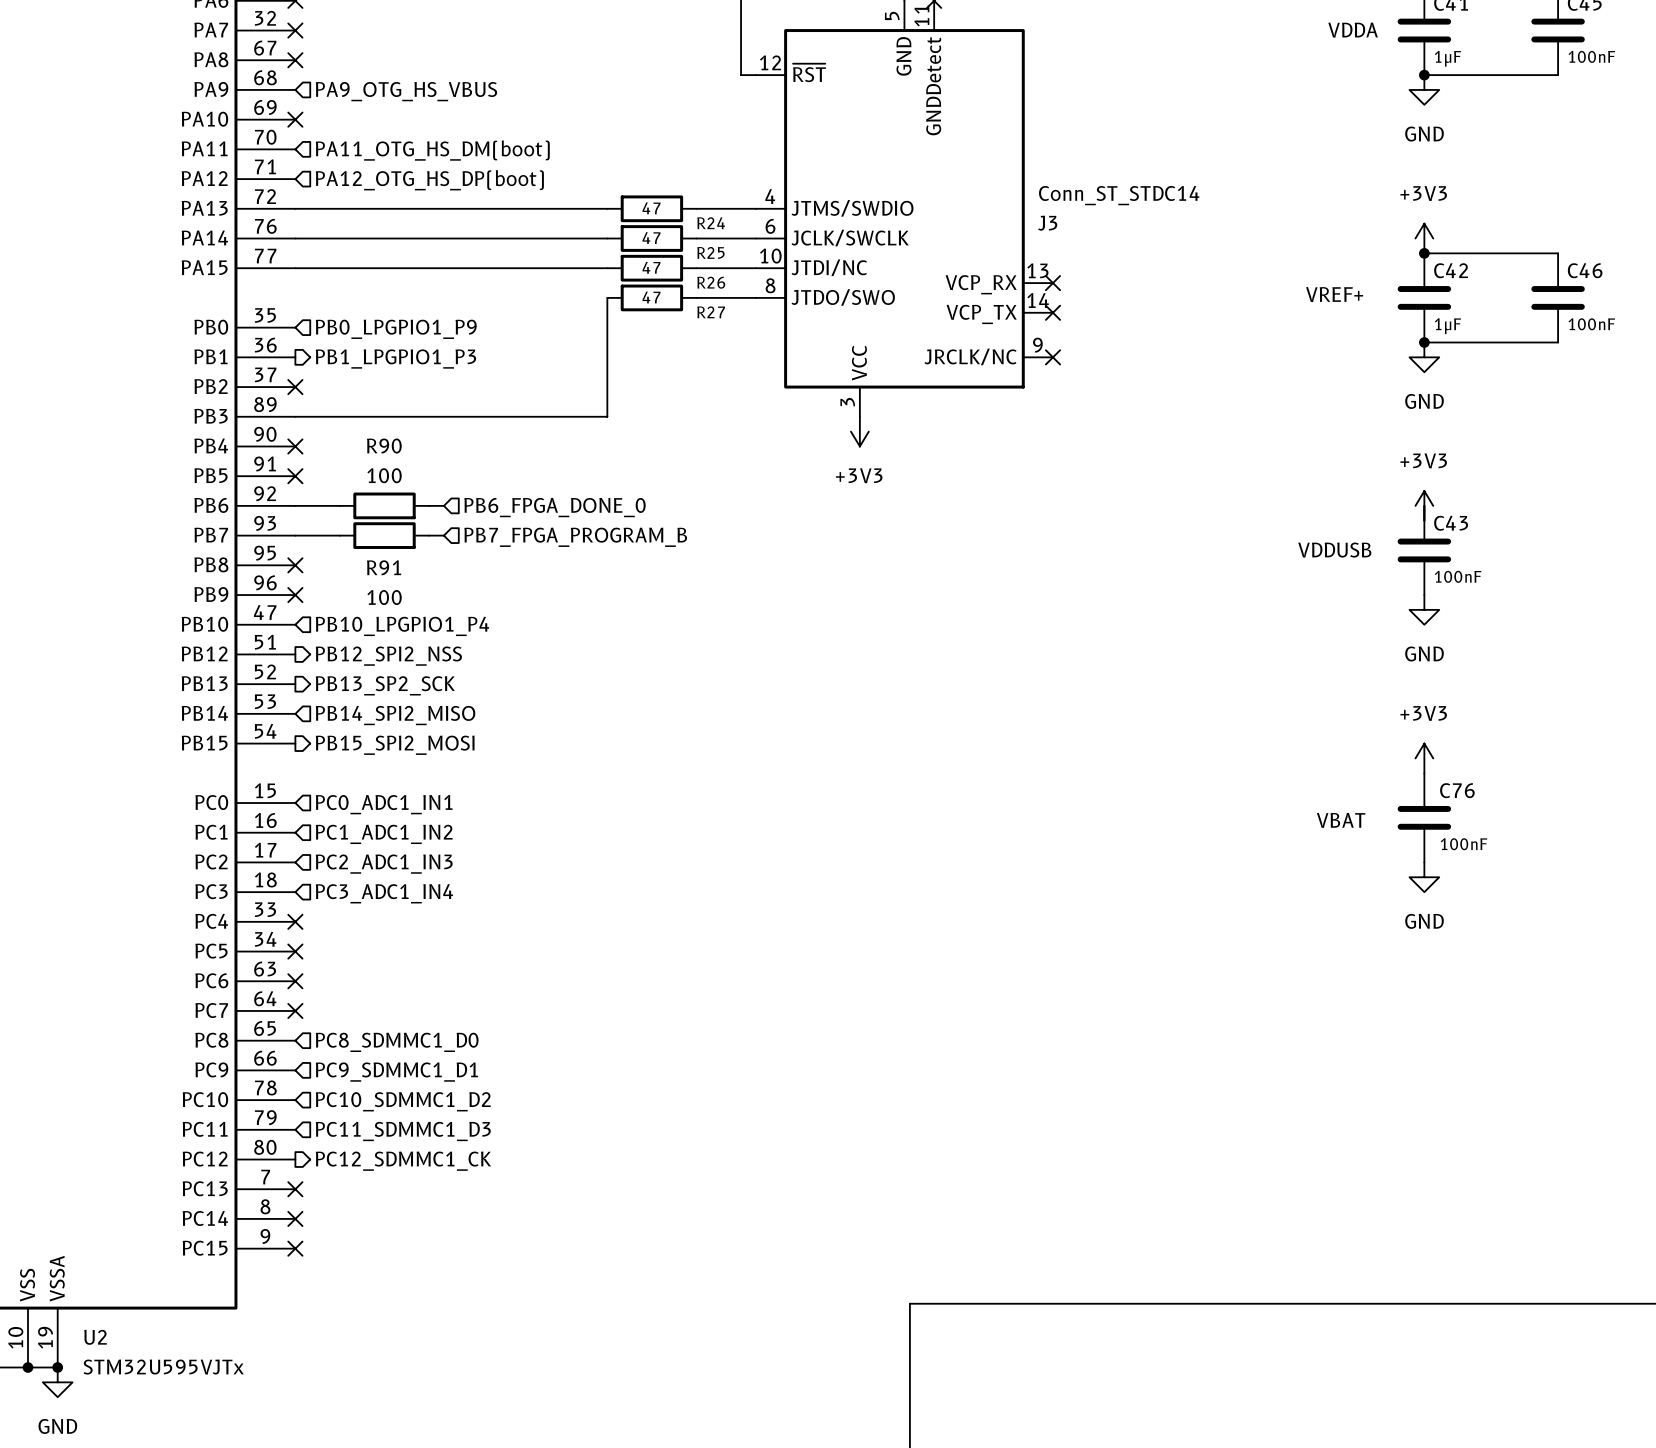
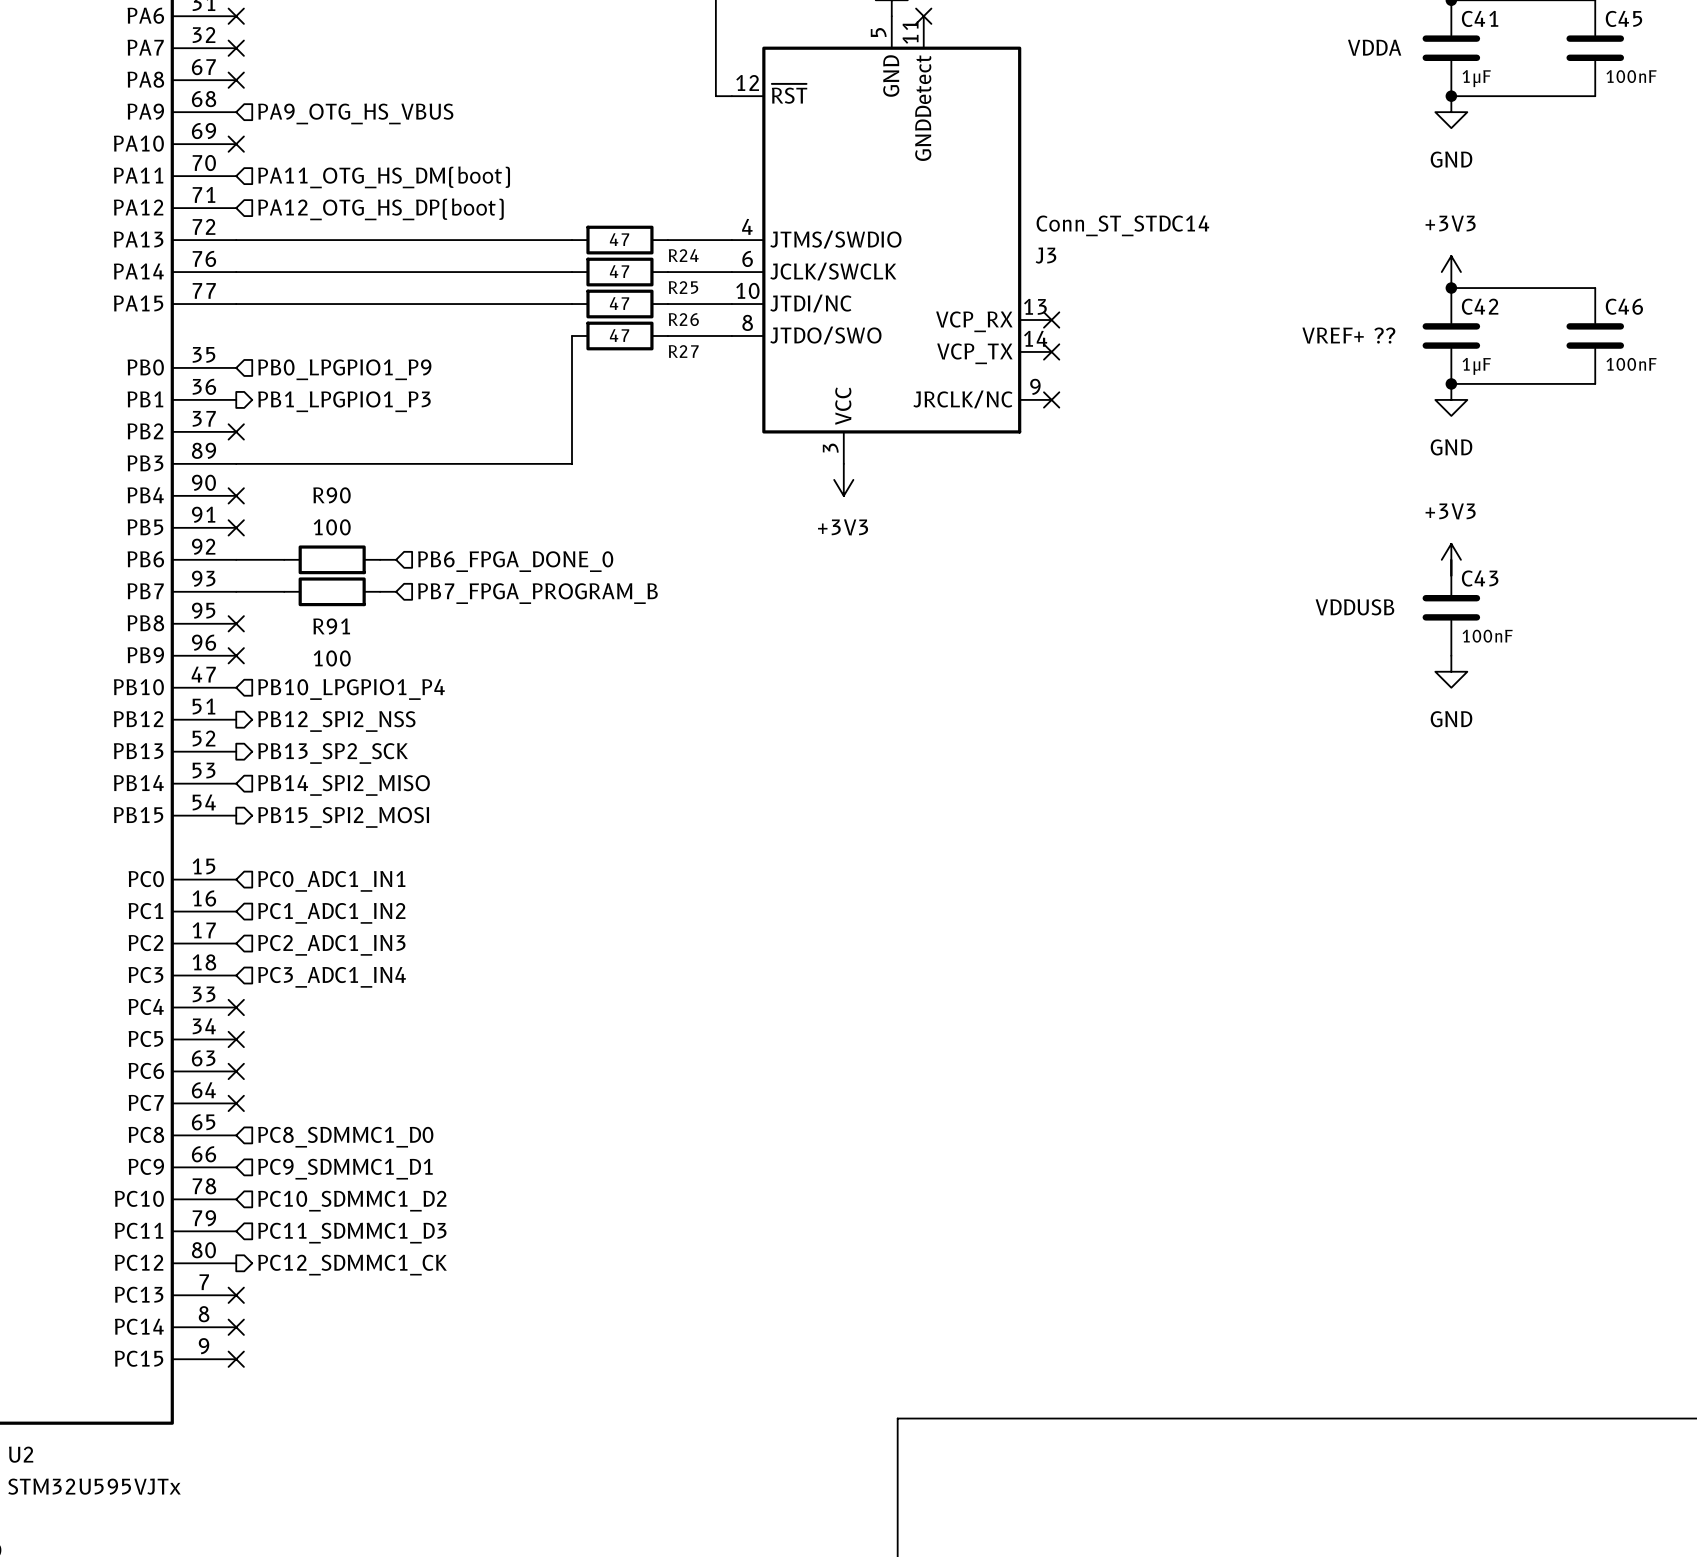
text: VREF+ (1334, 294) -> VREF+ ?? (1348, 335)
power symbol: +3V3 (1424, 758) -> none
C76: 100nF (1424, 817) -> none
text: VBAT (1341, 820) -> none
power symbol: GND (1424, 877) -> none

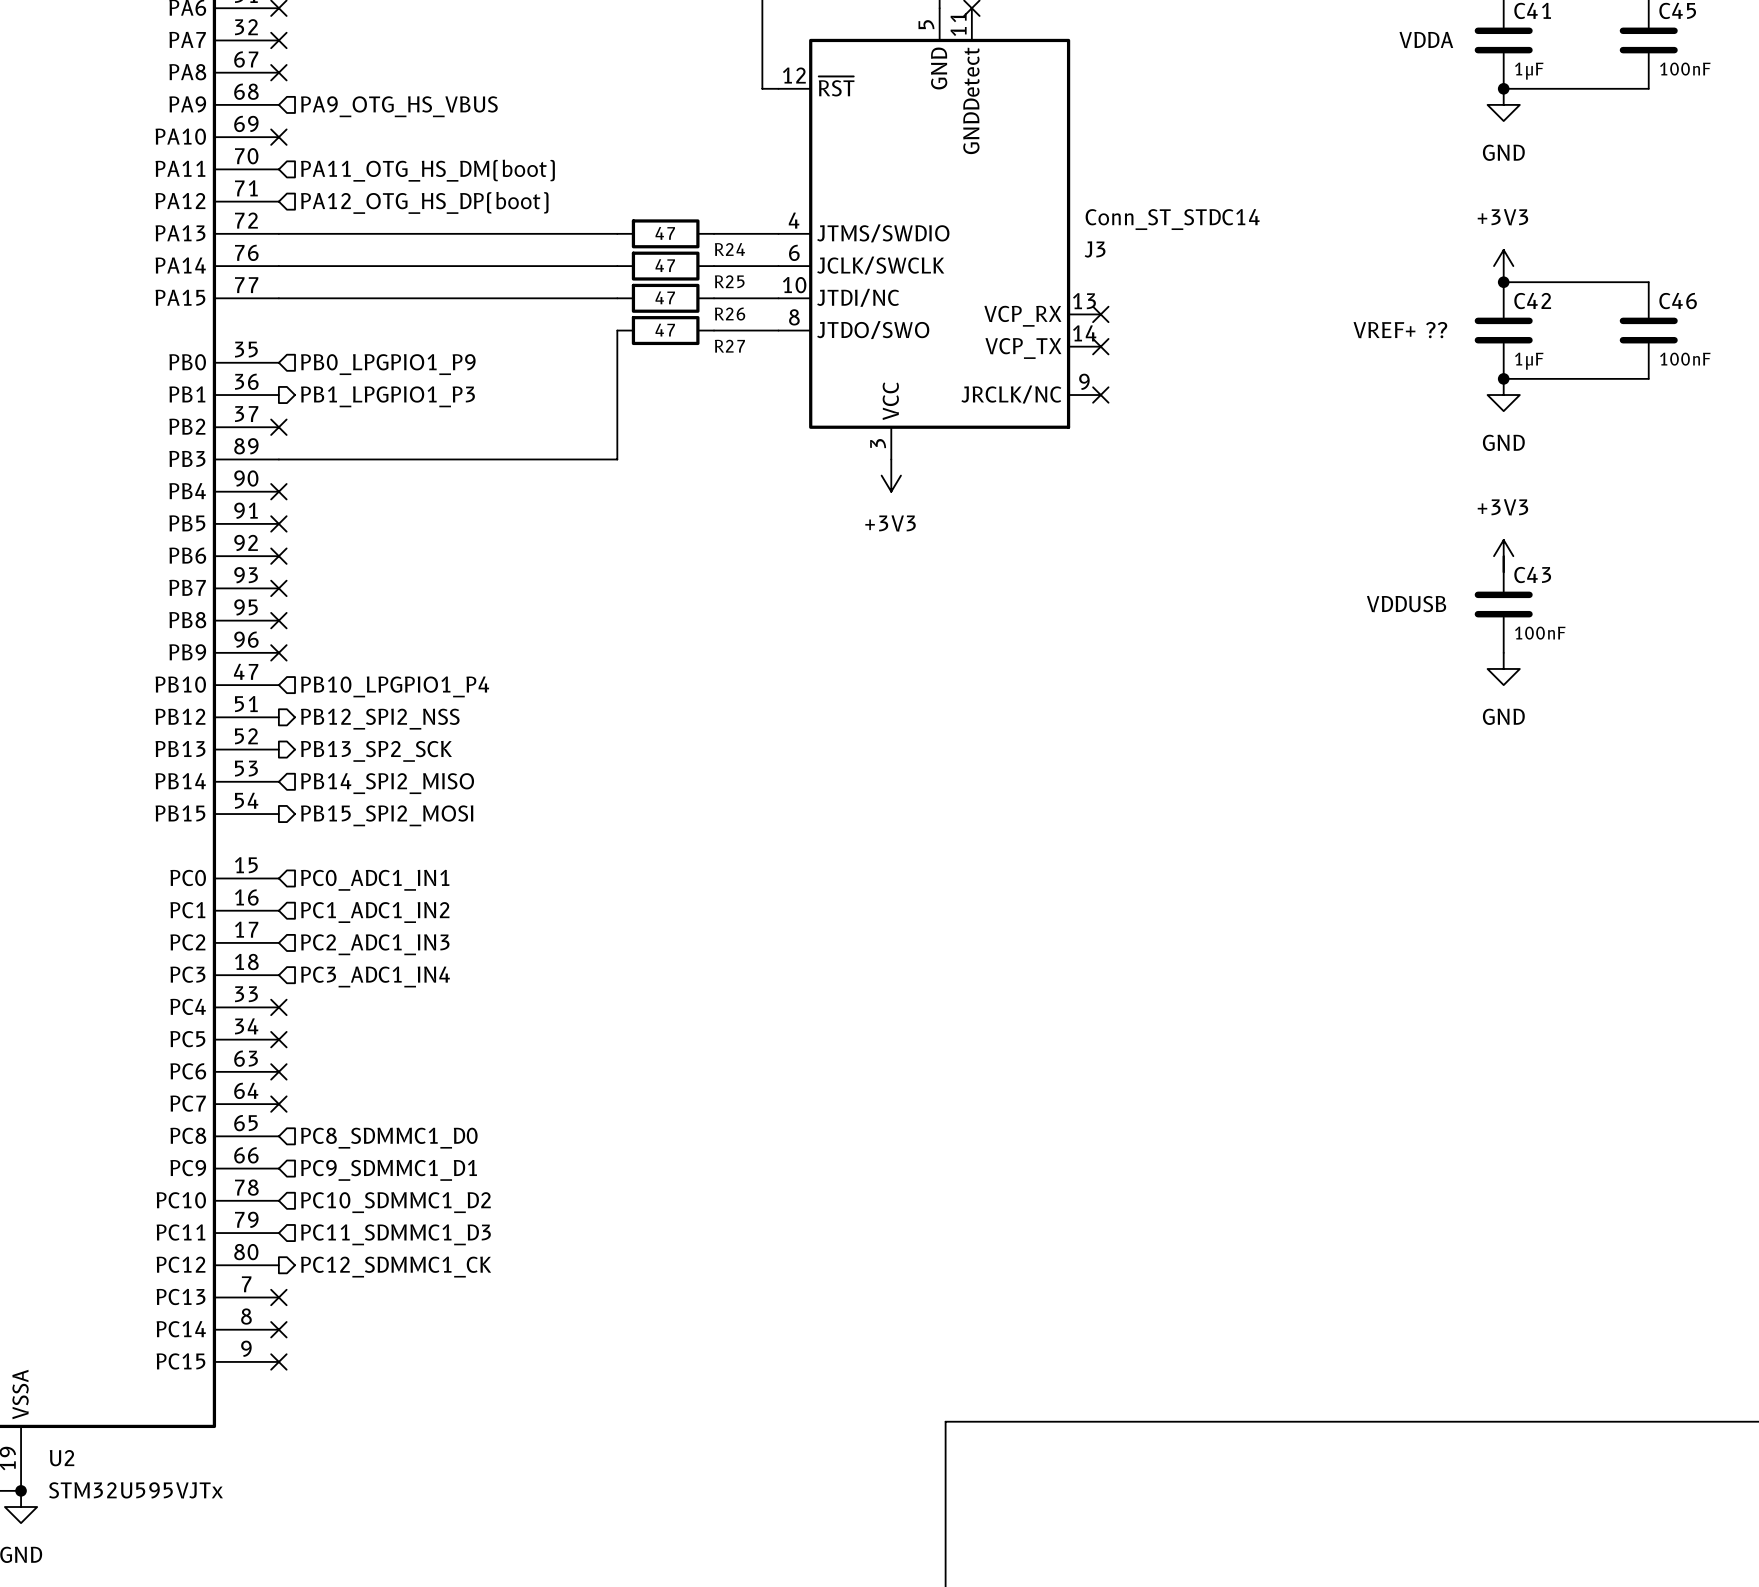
wire: (236, 559) (284, 559) -> none
no-connect mark: none -> (278, 556)
R90: 100 (332, 559) -> none
wire: (380, 559) (396, 559) -> none
hierarchical label: PB6_FPGA_DONE_0 (515, 561) -> none
wire: (236, 591) (284, 591) -> none
no-connect mark: none -> (278, 588)
R91: 100 (332, 591) -> none
wire: (380, 591) (396, 591) -> none
hierarchical label: PB7_FPGA_PROGRAM_B (537, 593) -> none

